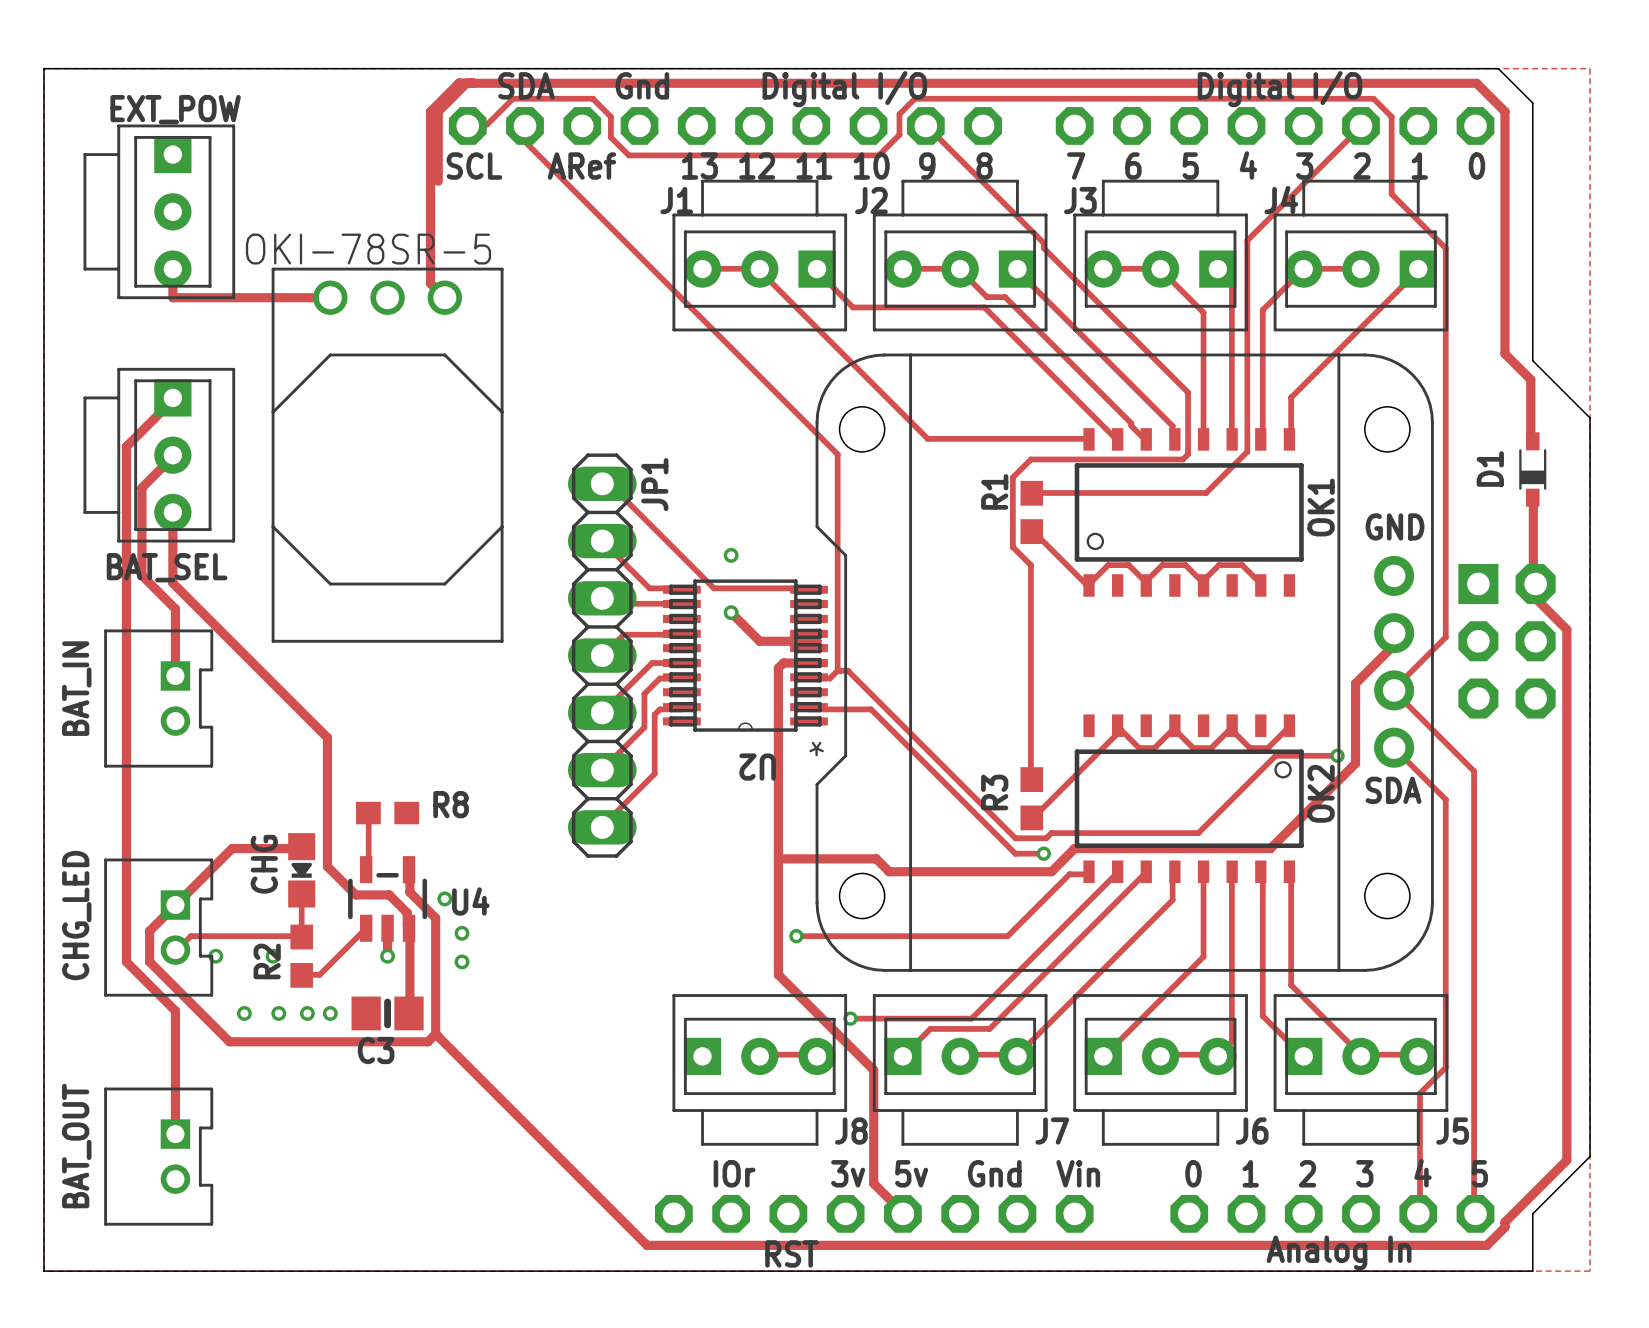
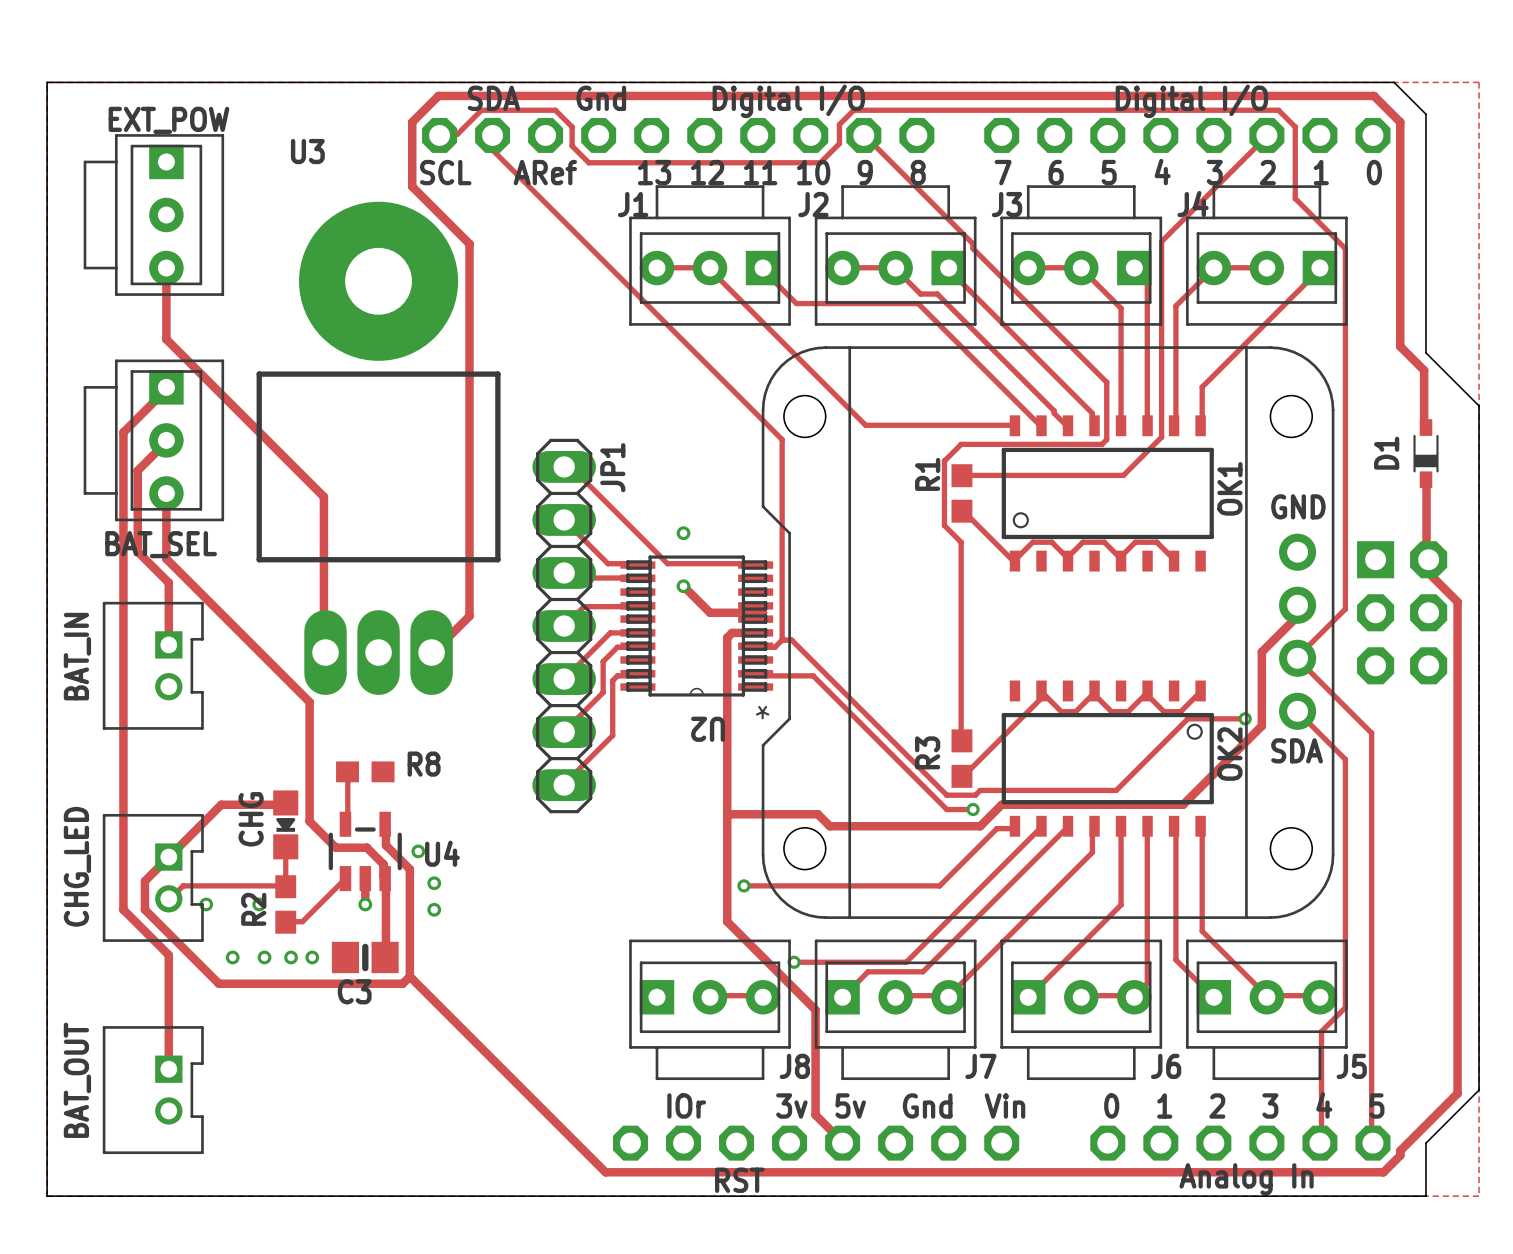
track: (473, 82) (459, 82) (430, 111) (430, 283) (444, 297) -> none
track: none -> (412, 186) (469, 243) (469, 616) (431, 652)
track: (172, 297) (330, 297) -> (166, 294) (166, 339) (323, 496) (323, 652) (325, 652)
OKI-78SR-5: (387, 455) -> none
U3: none -> (378, 448)

